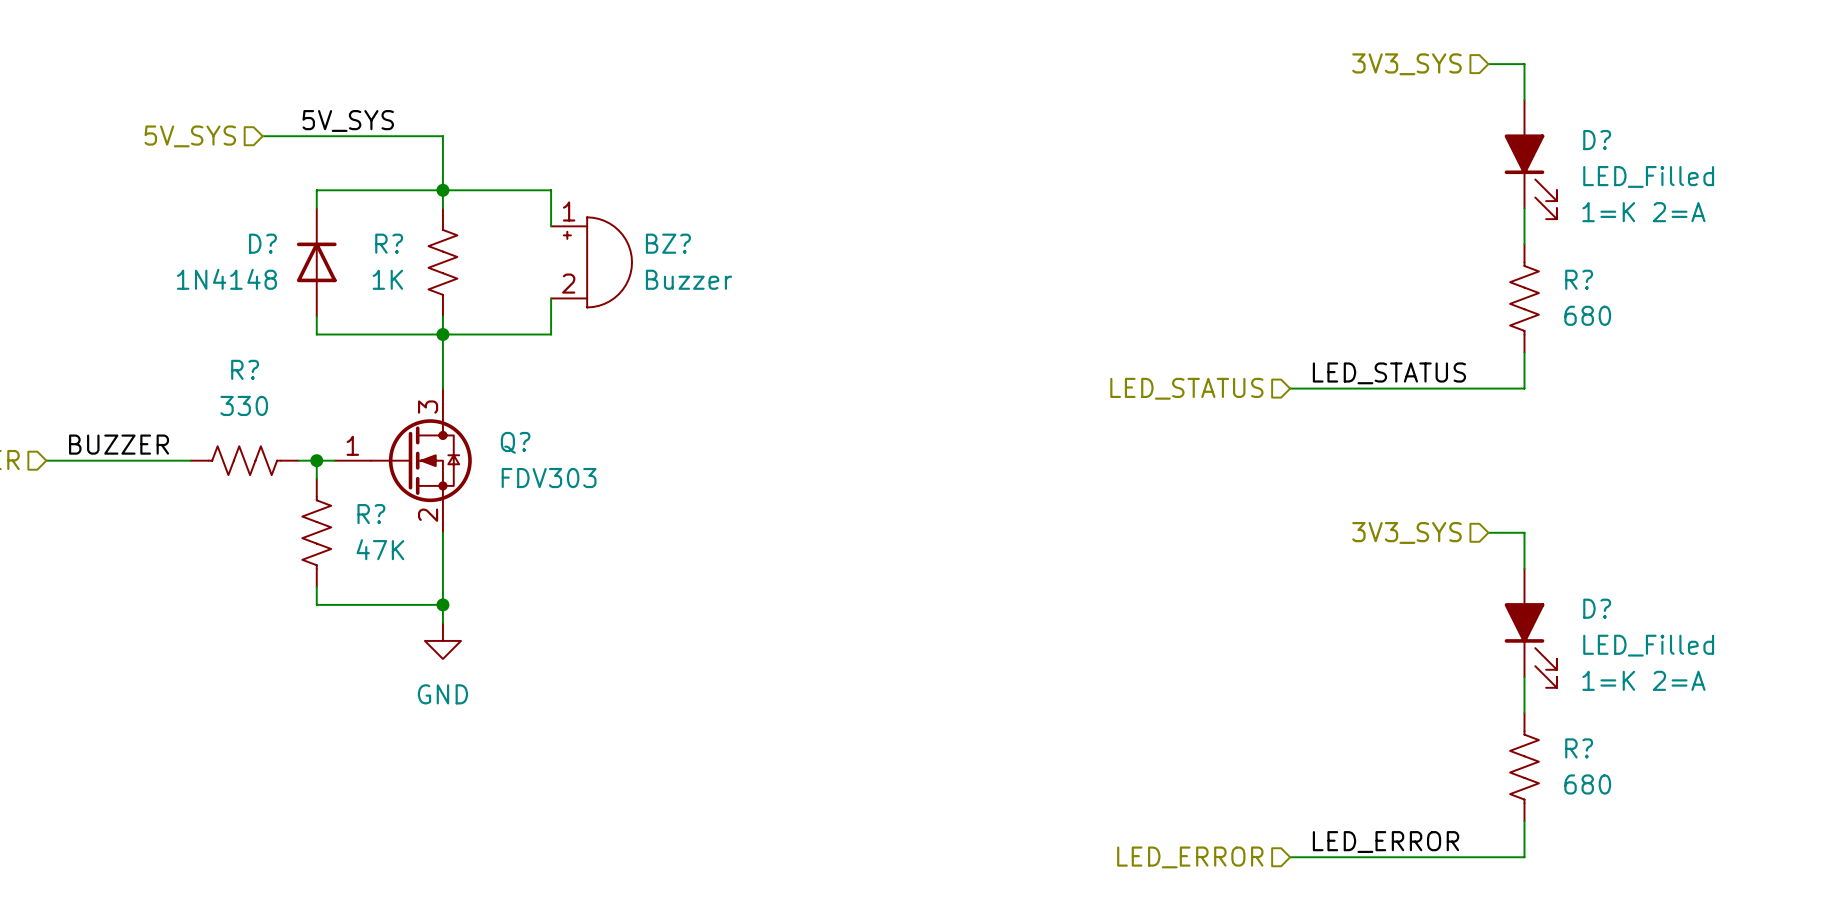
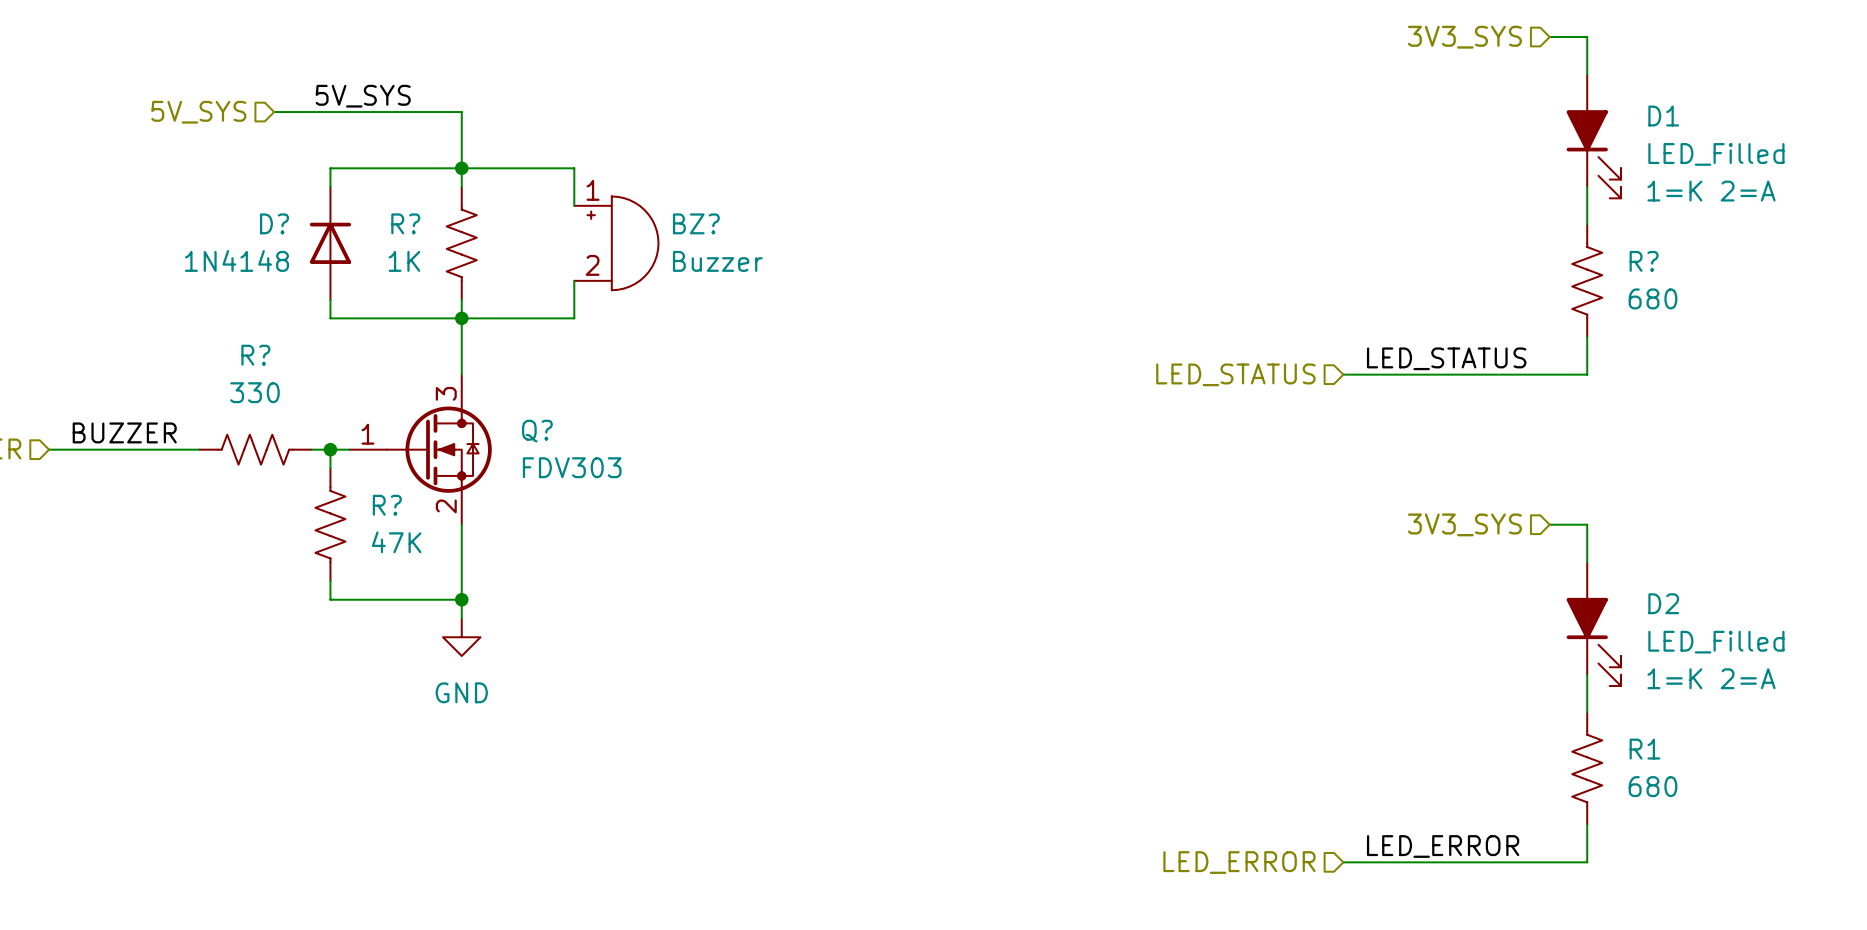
D? name: D? (1597, 140) -> D1 (1663, 116)
D? name: D? (1597, 608) -> D2 (1663, 603)
R? name: R? (1579, 748) -> R1 (1644, 749)

